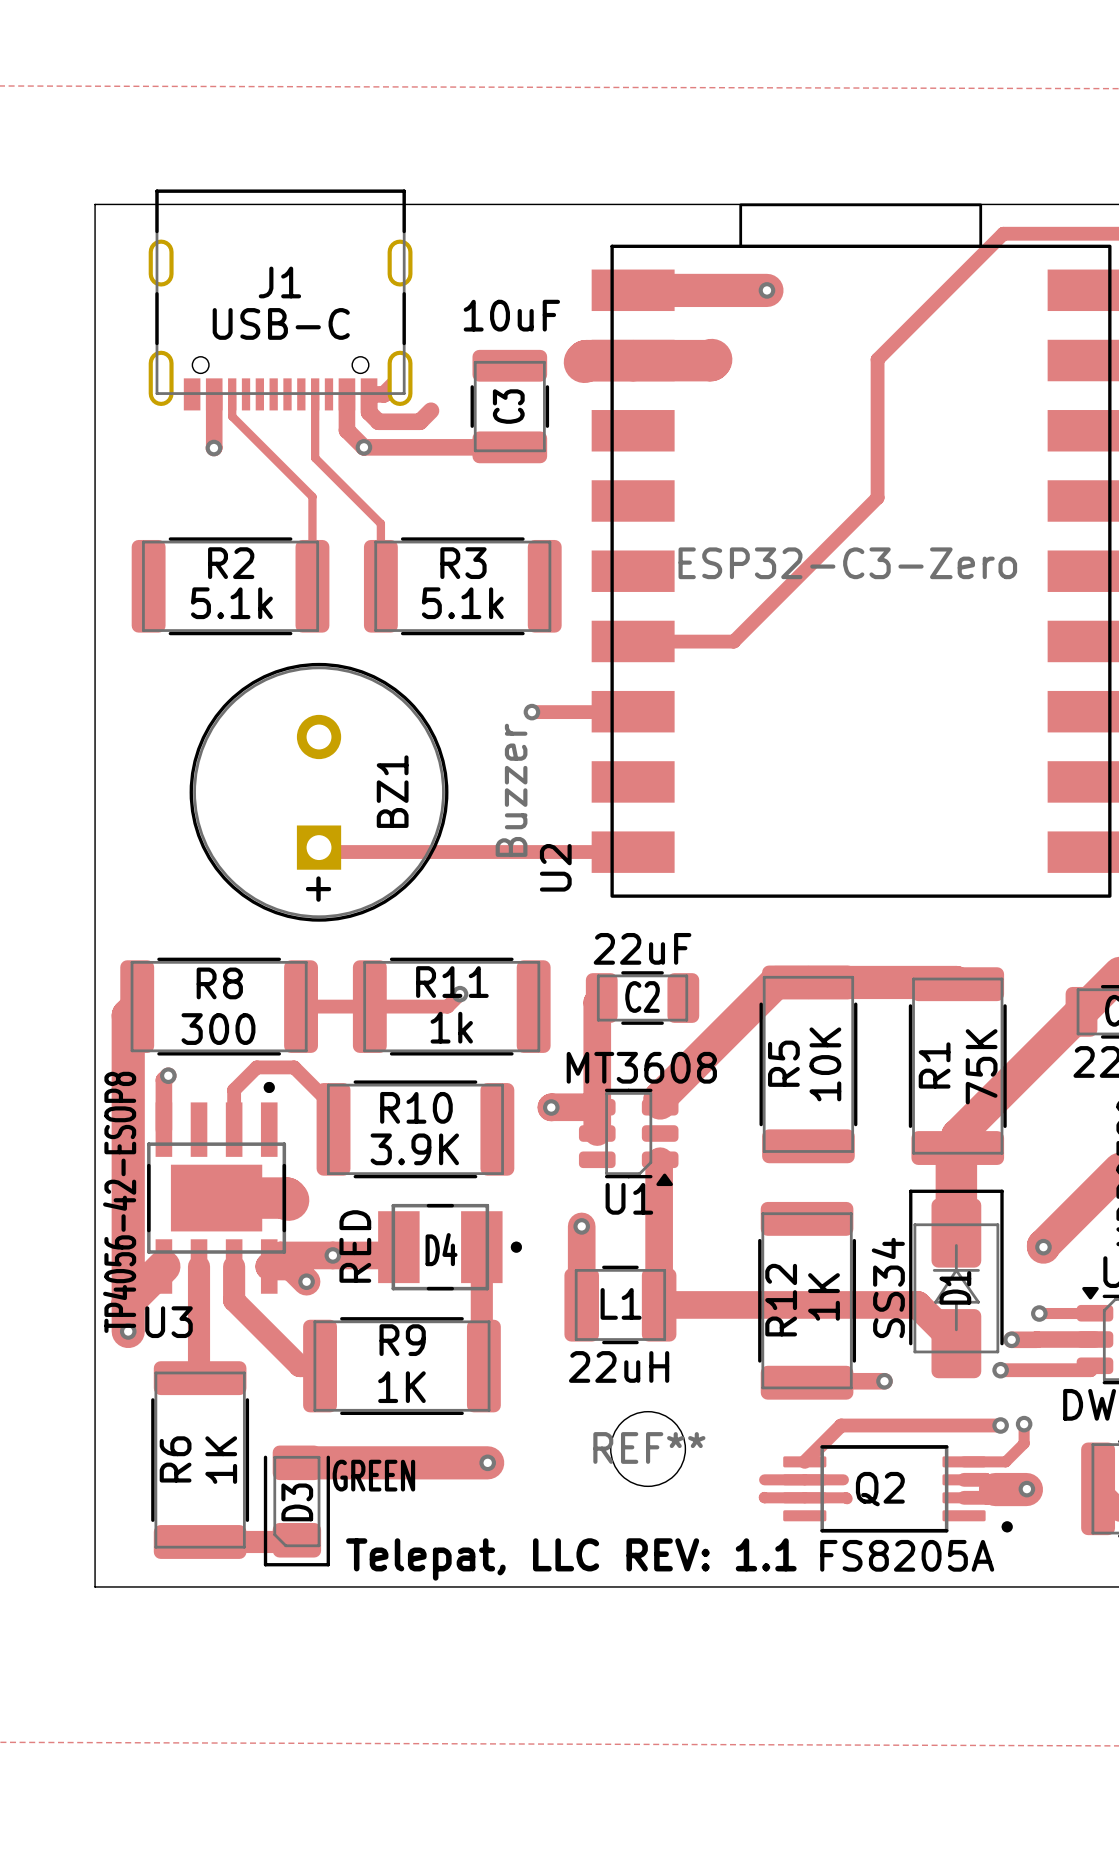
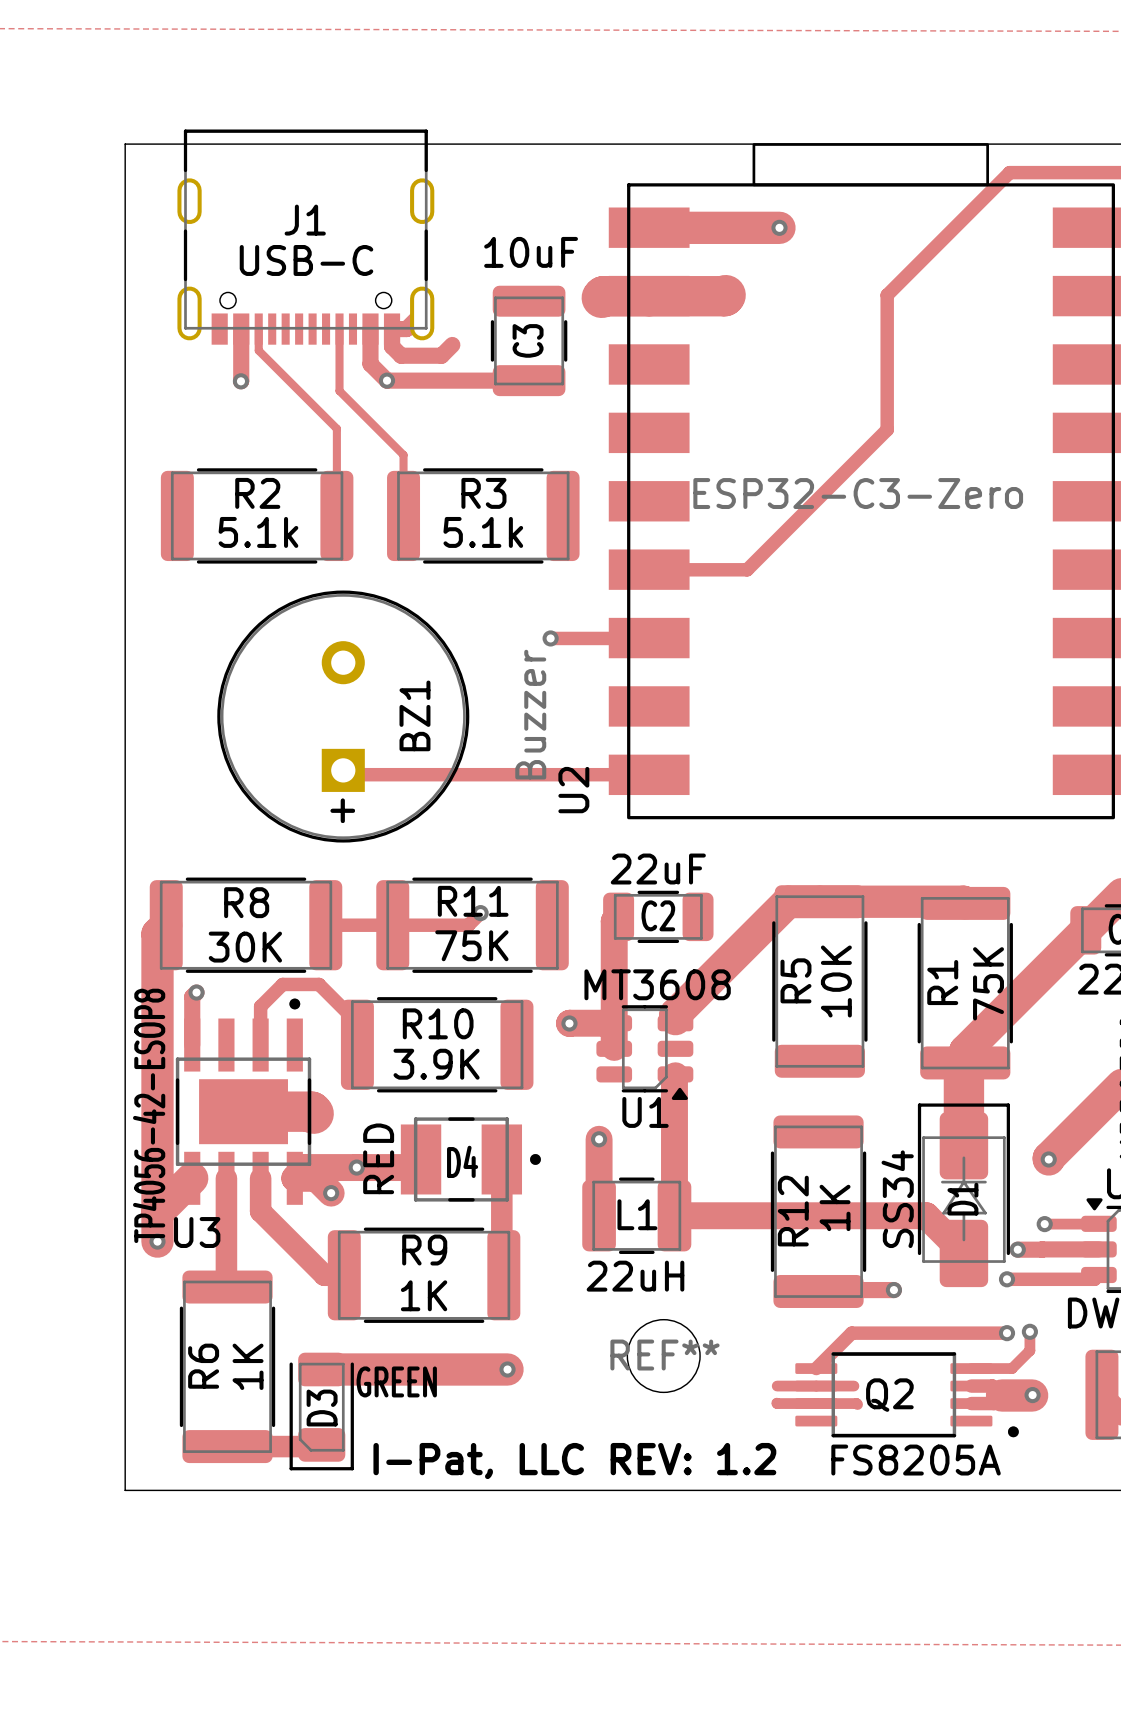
R11 value: 1k (451, 1027) -> 75K (471, 945)
R8 value: 300 (218, 1029) -> 30K (245, 947)
text: Telepat, LLC REV: 1.1 (571, 1559) -> I-Pat, LLC REV: 1.2 (574, 1461)

